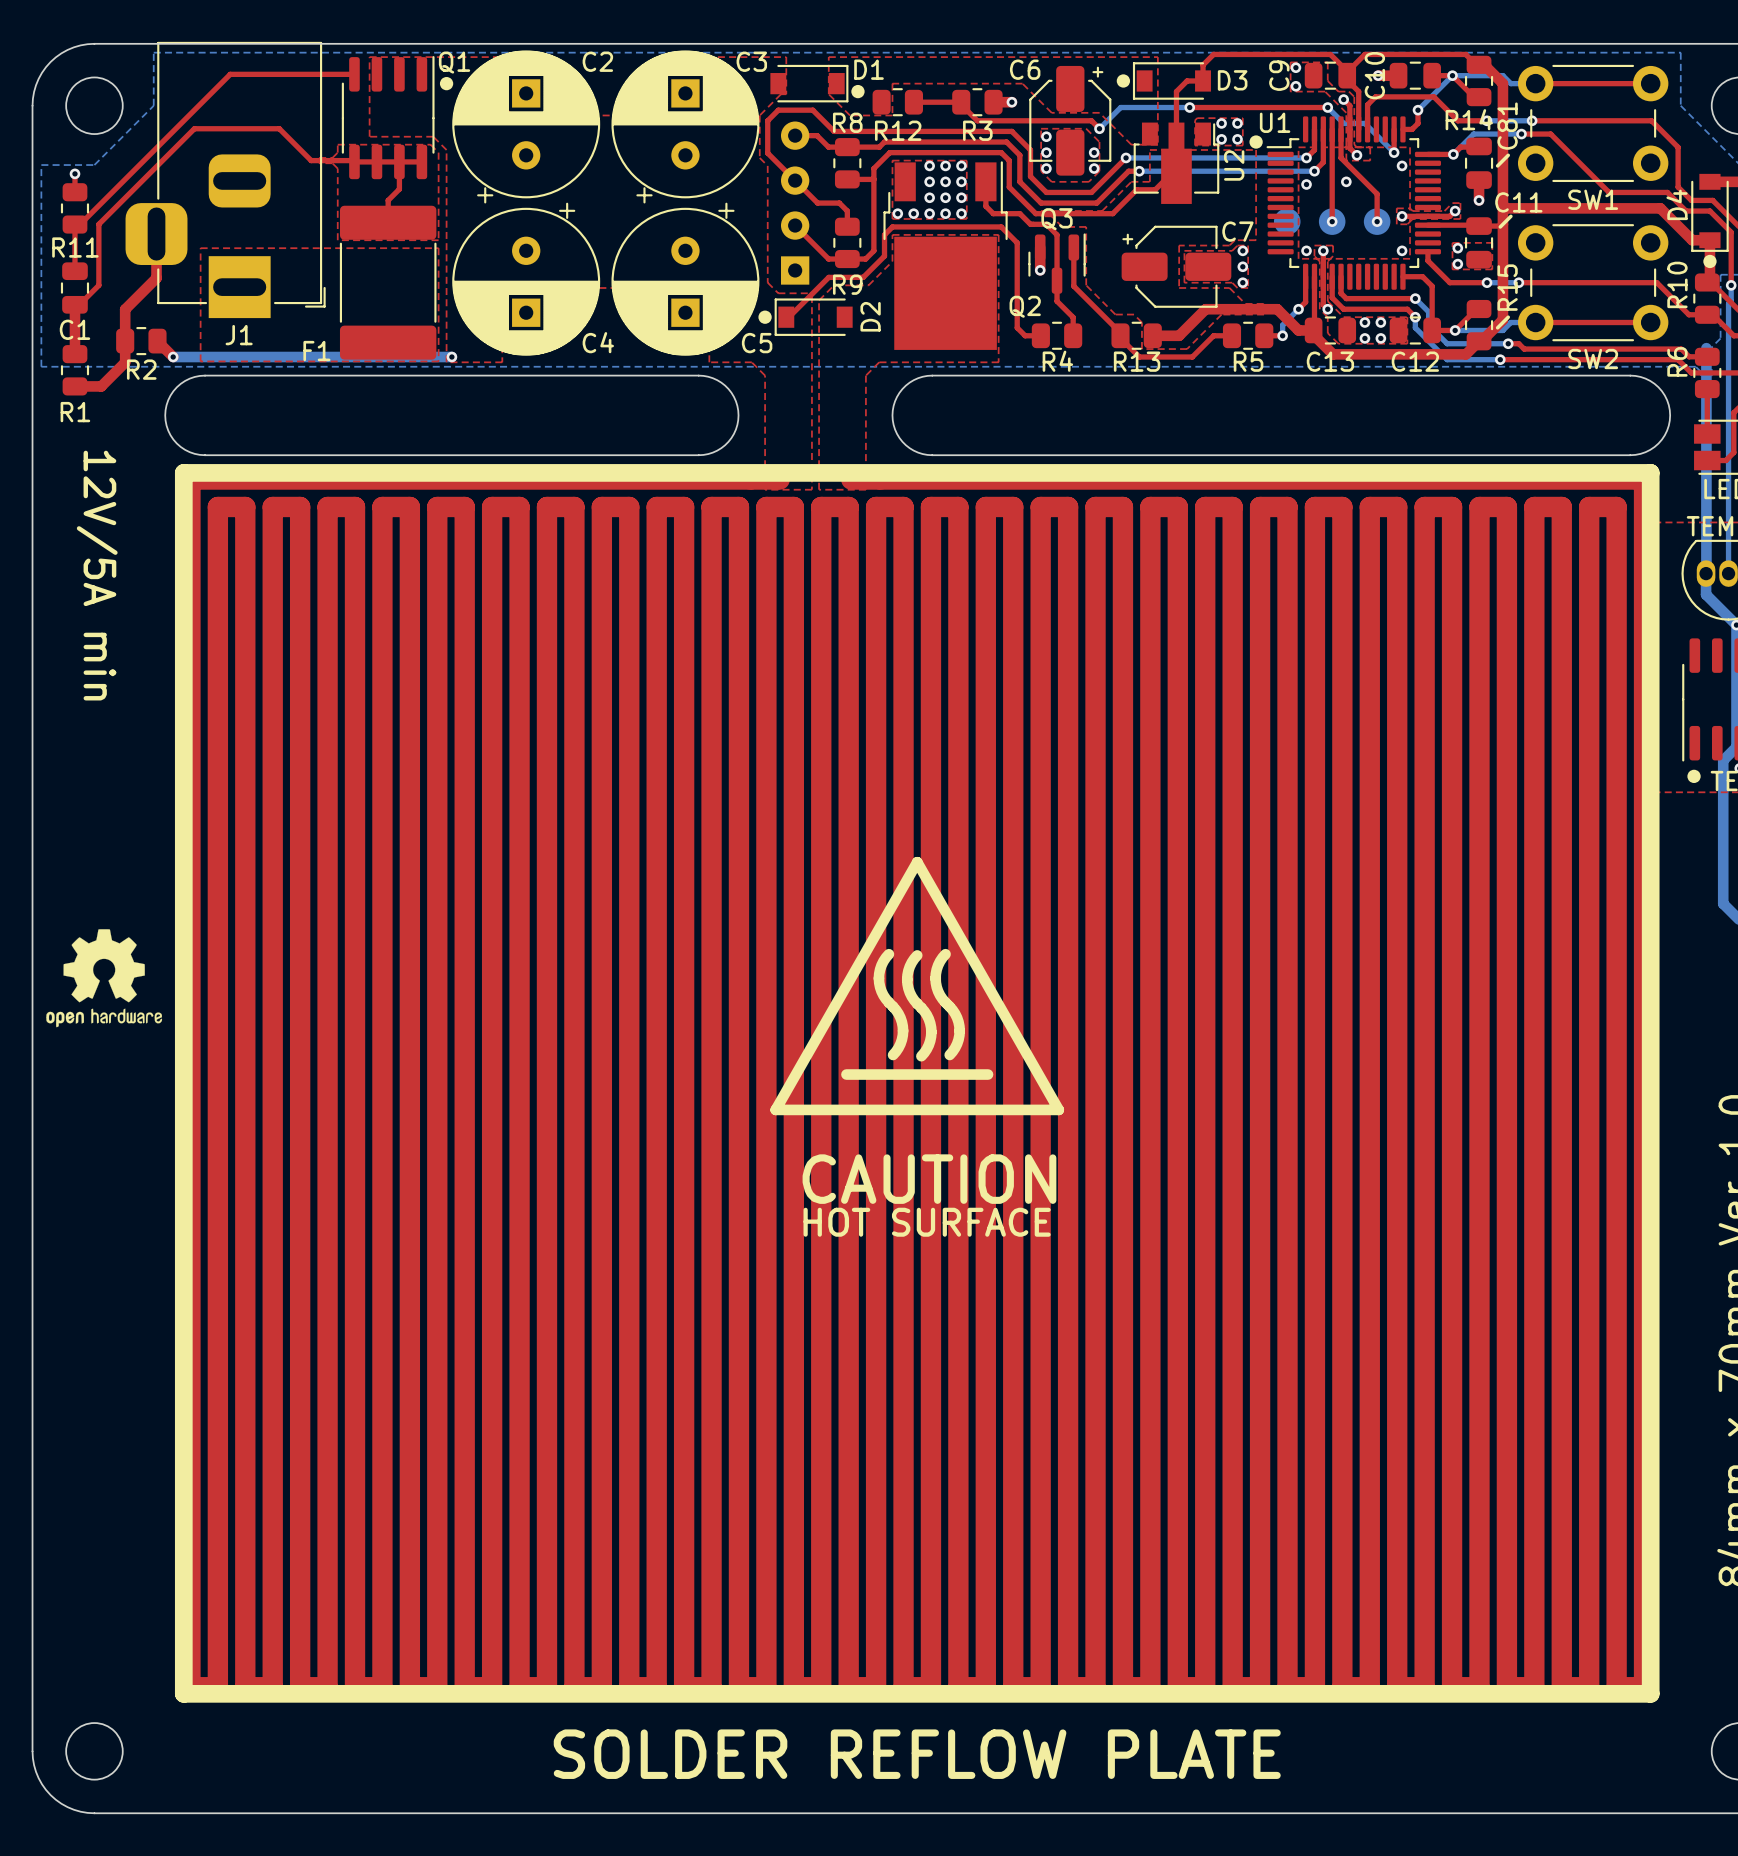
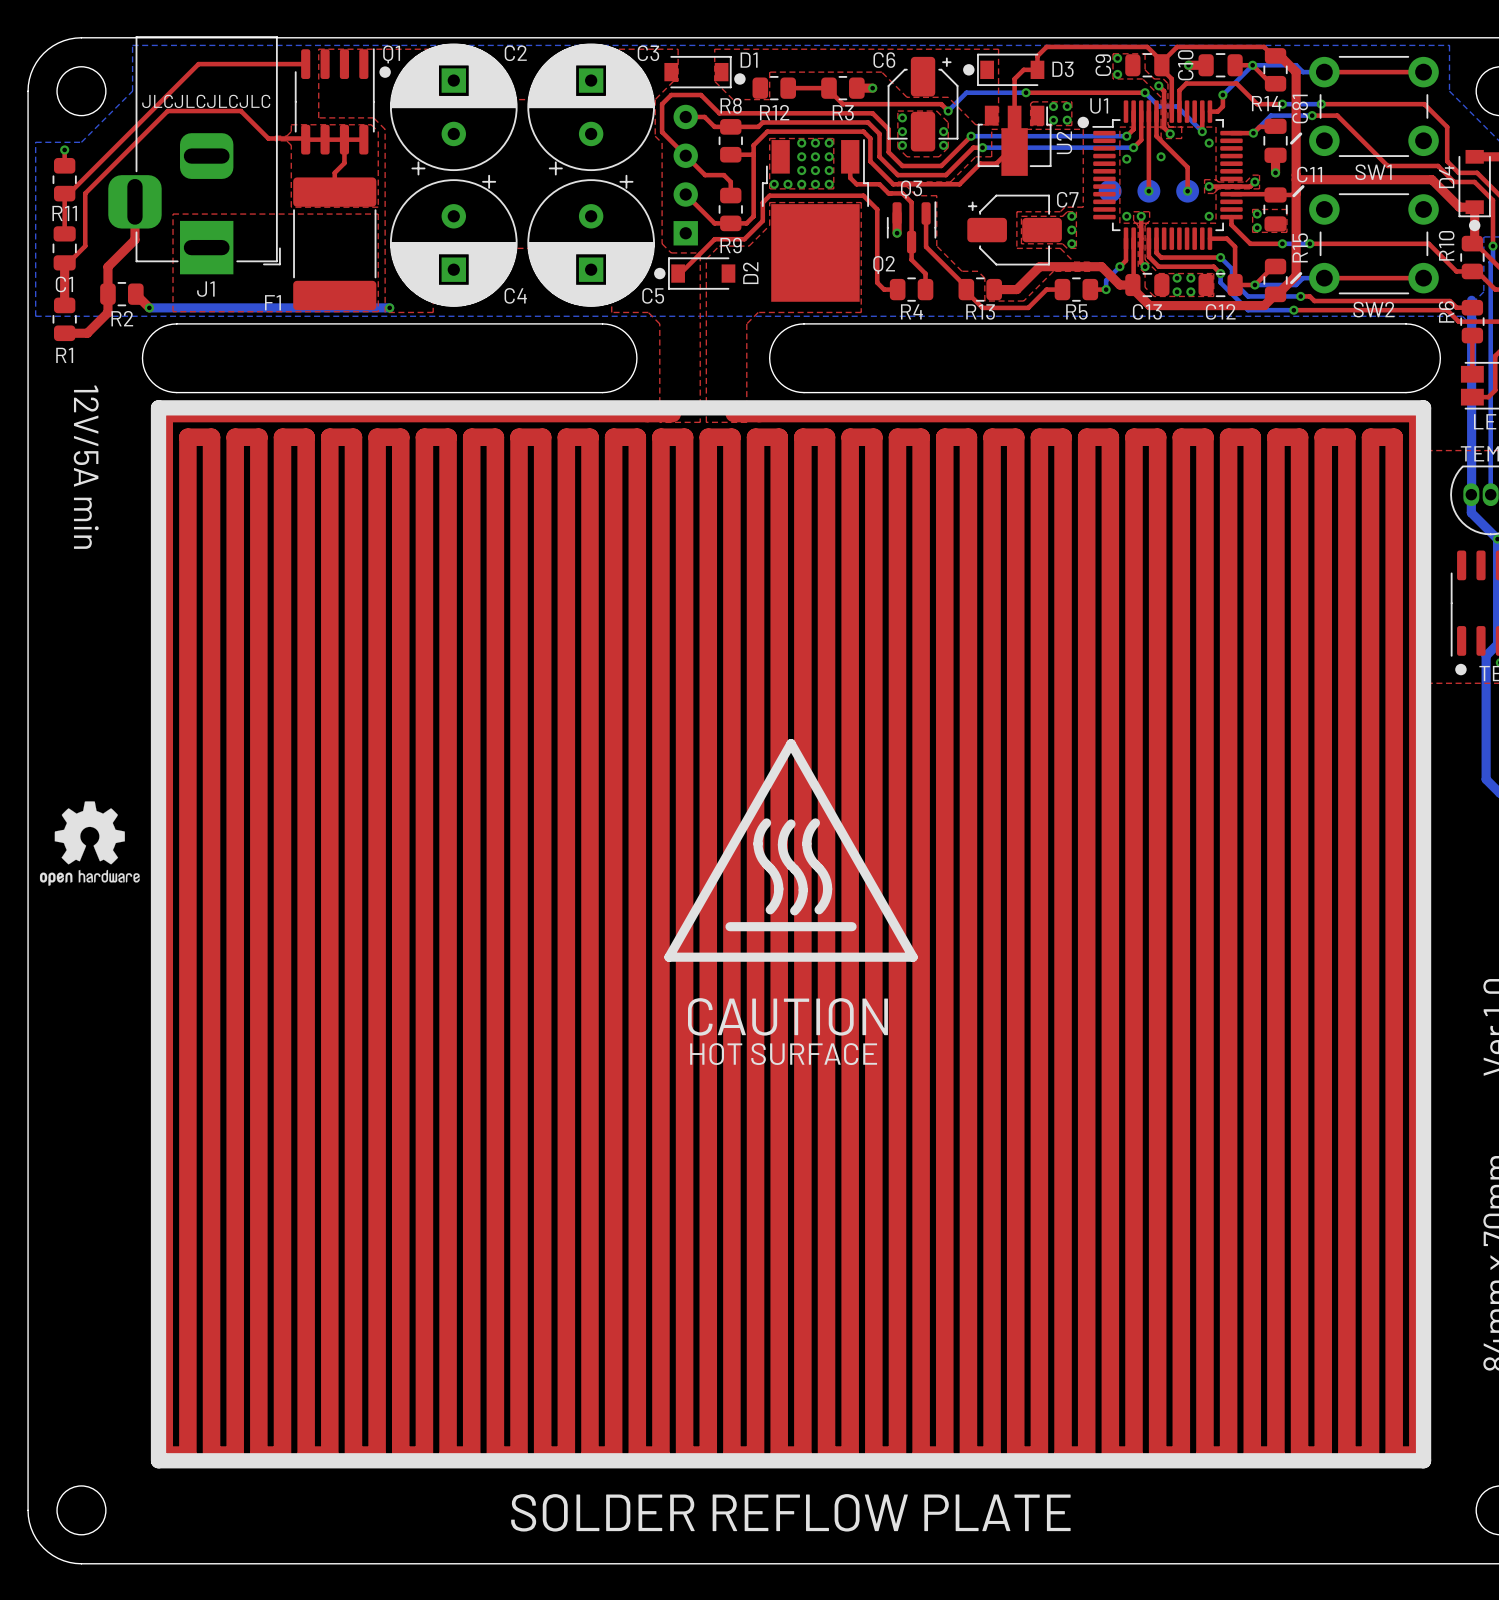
text: none -> JLCJLCJLCJLC (206, 101)

